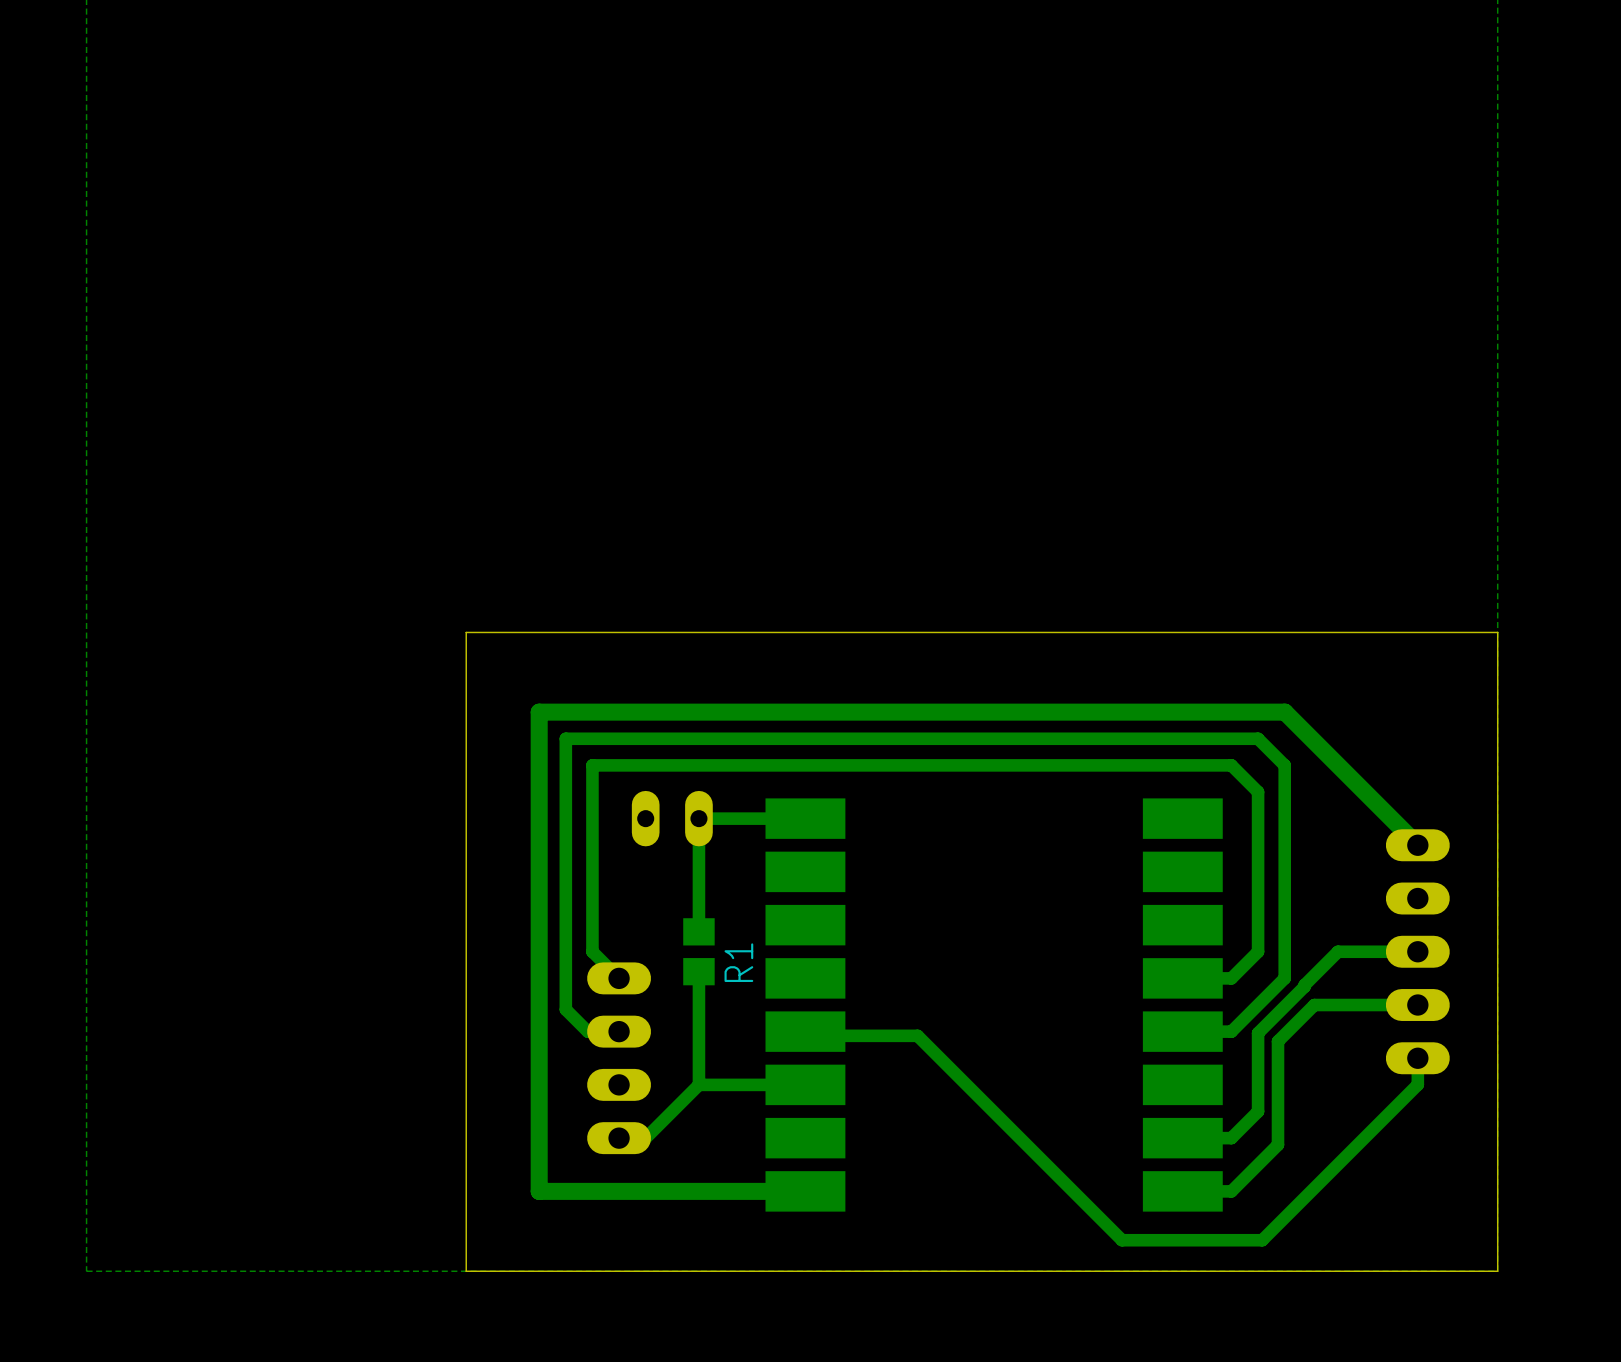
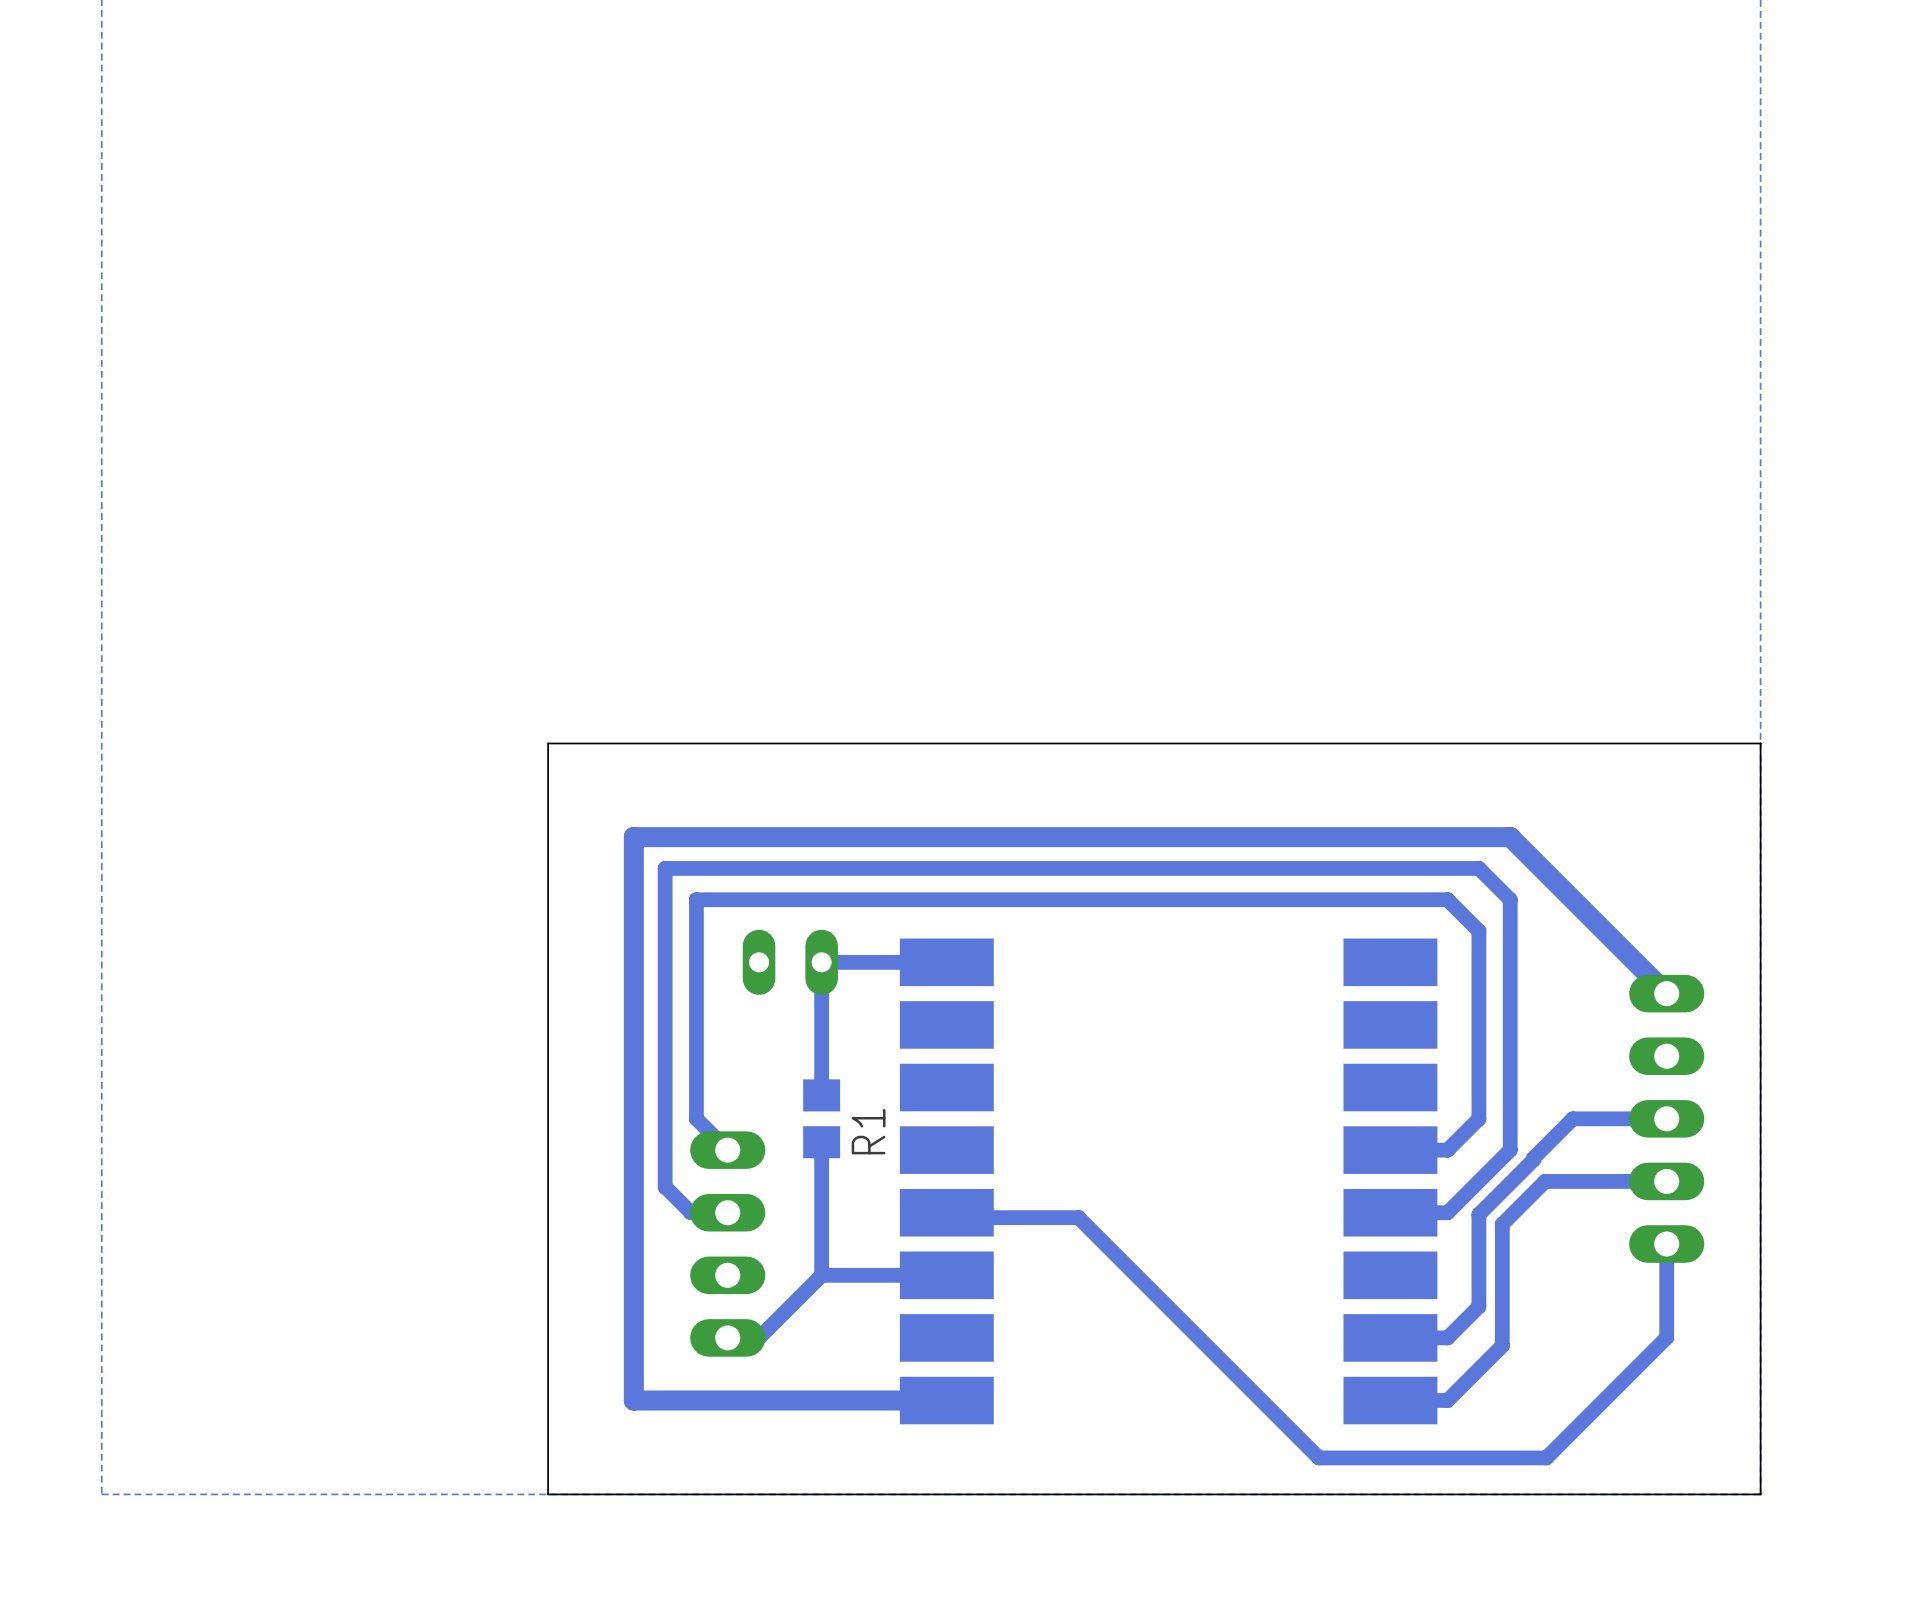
bottom track: (1417, 1084) (1262, 1240) -> (1666, 1275) (1666, 1337) (1546, 1457) (1483, 1457)

